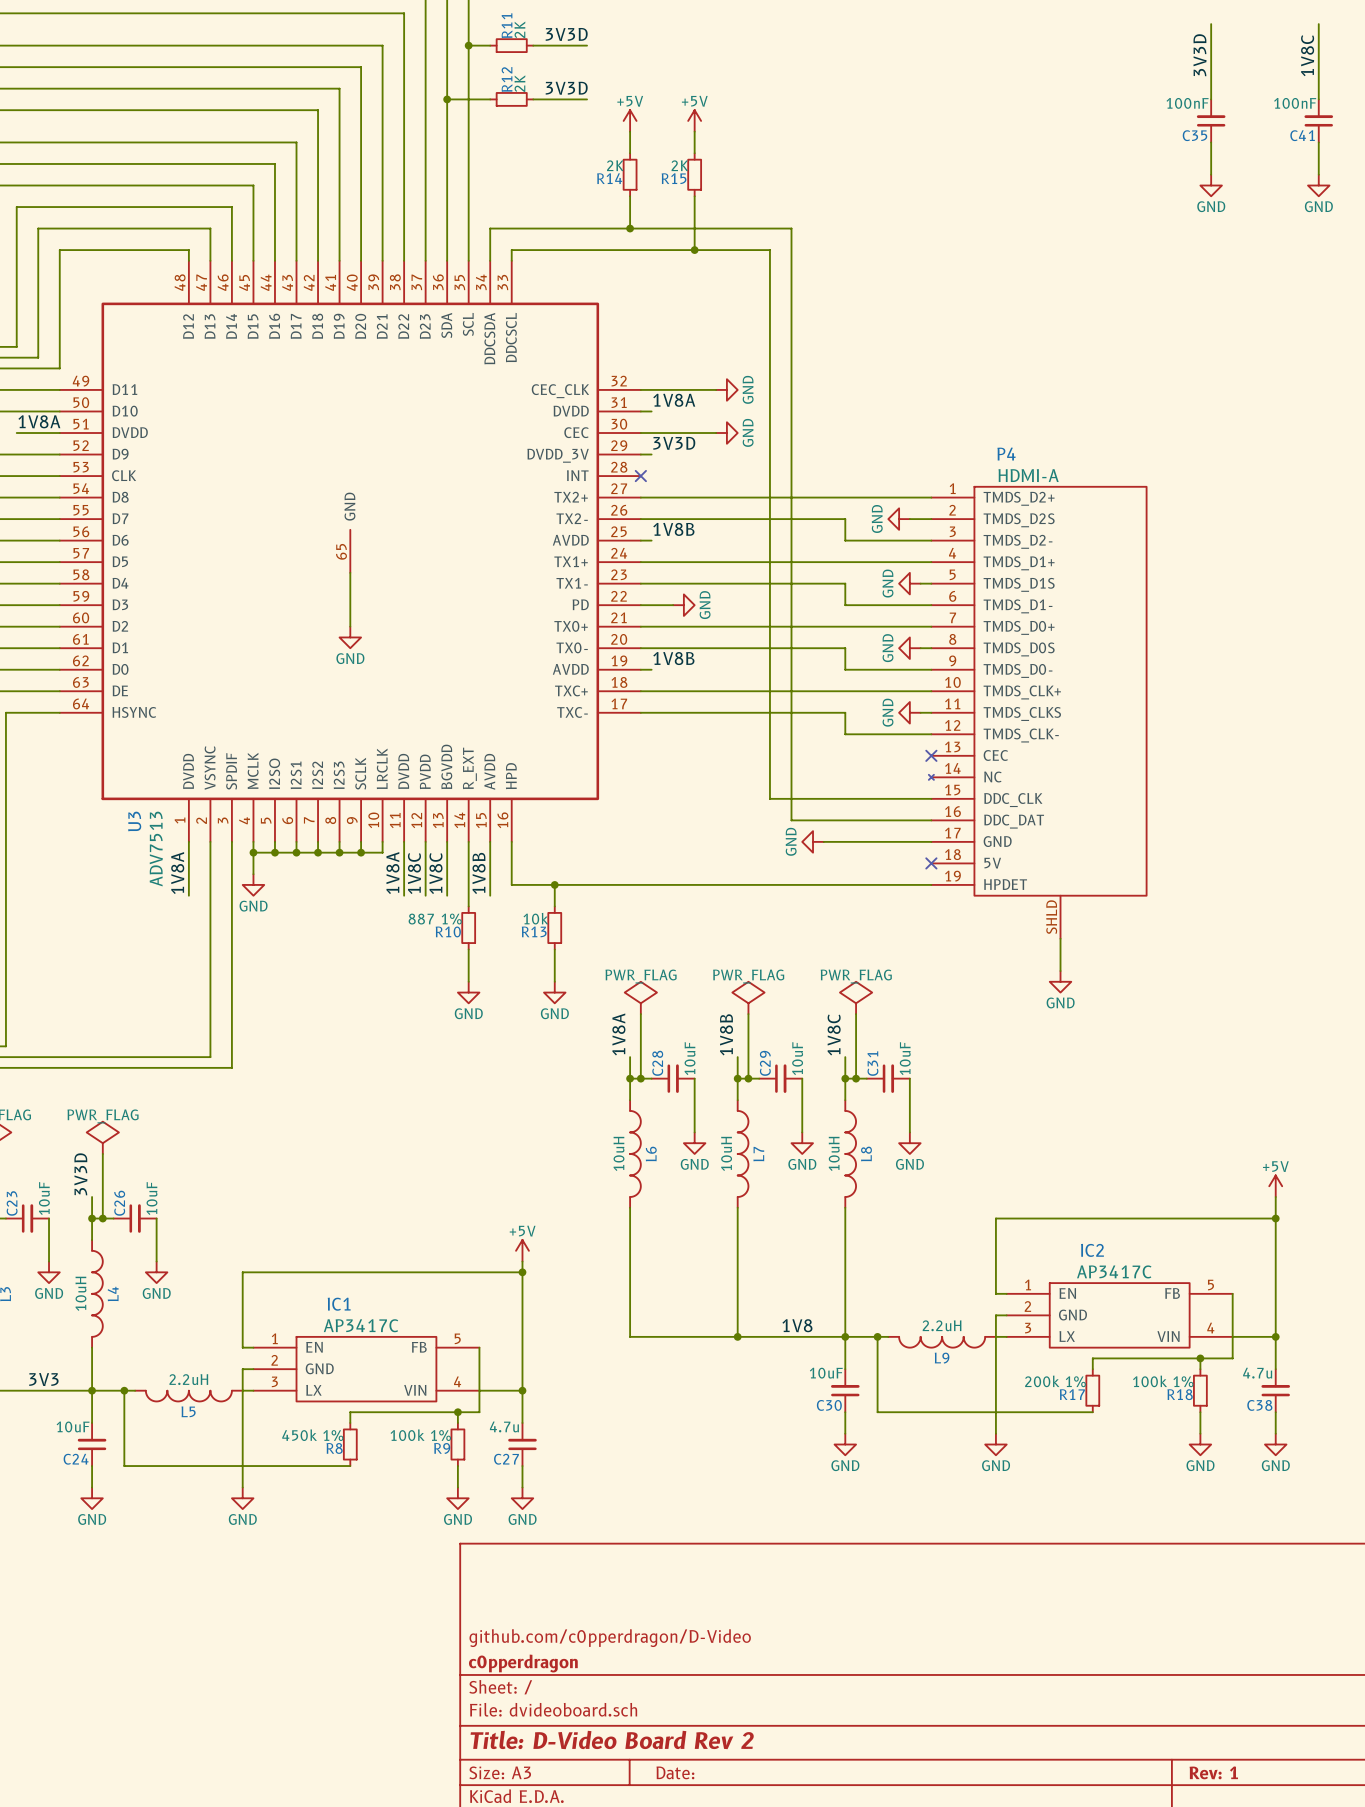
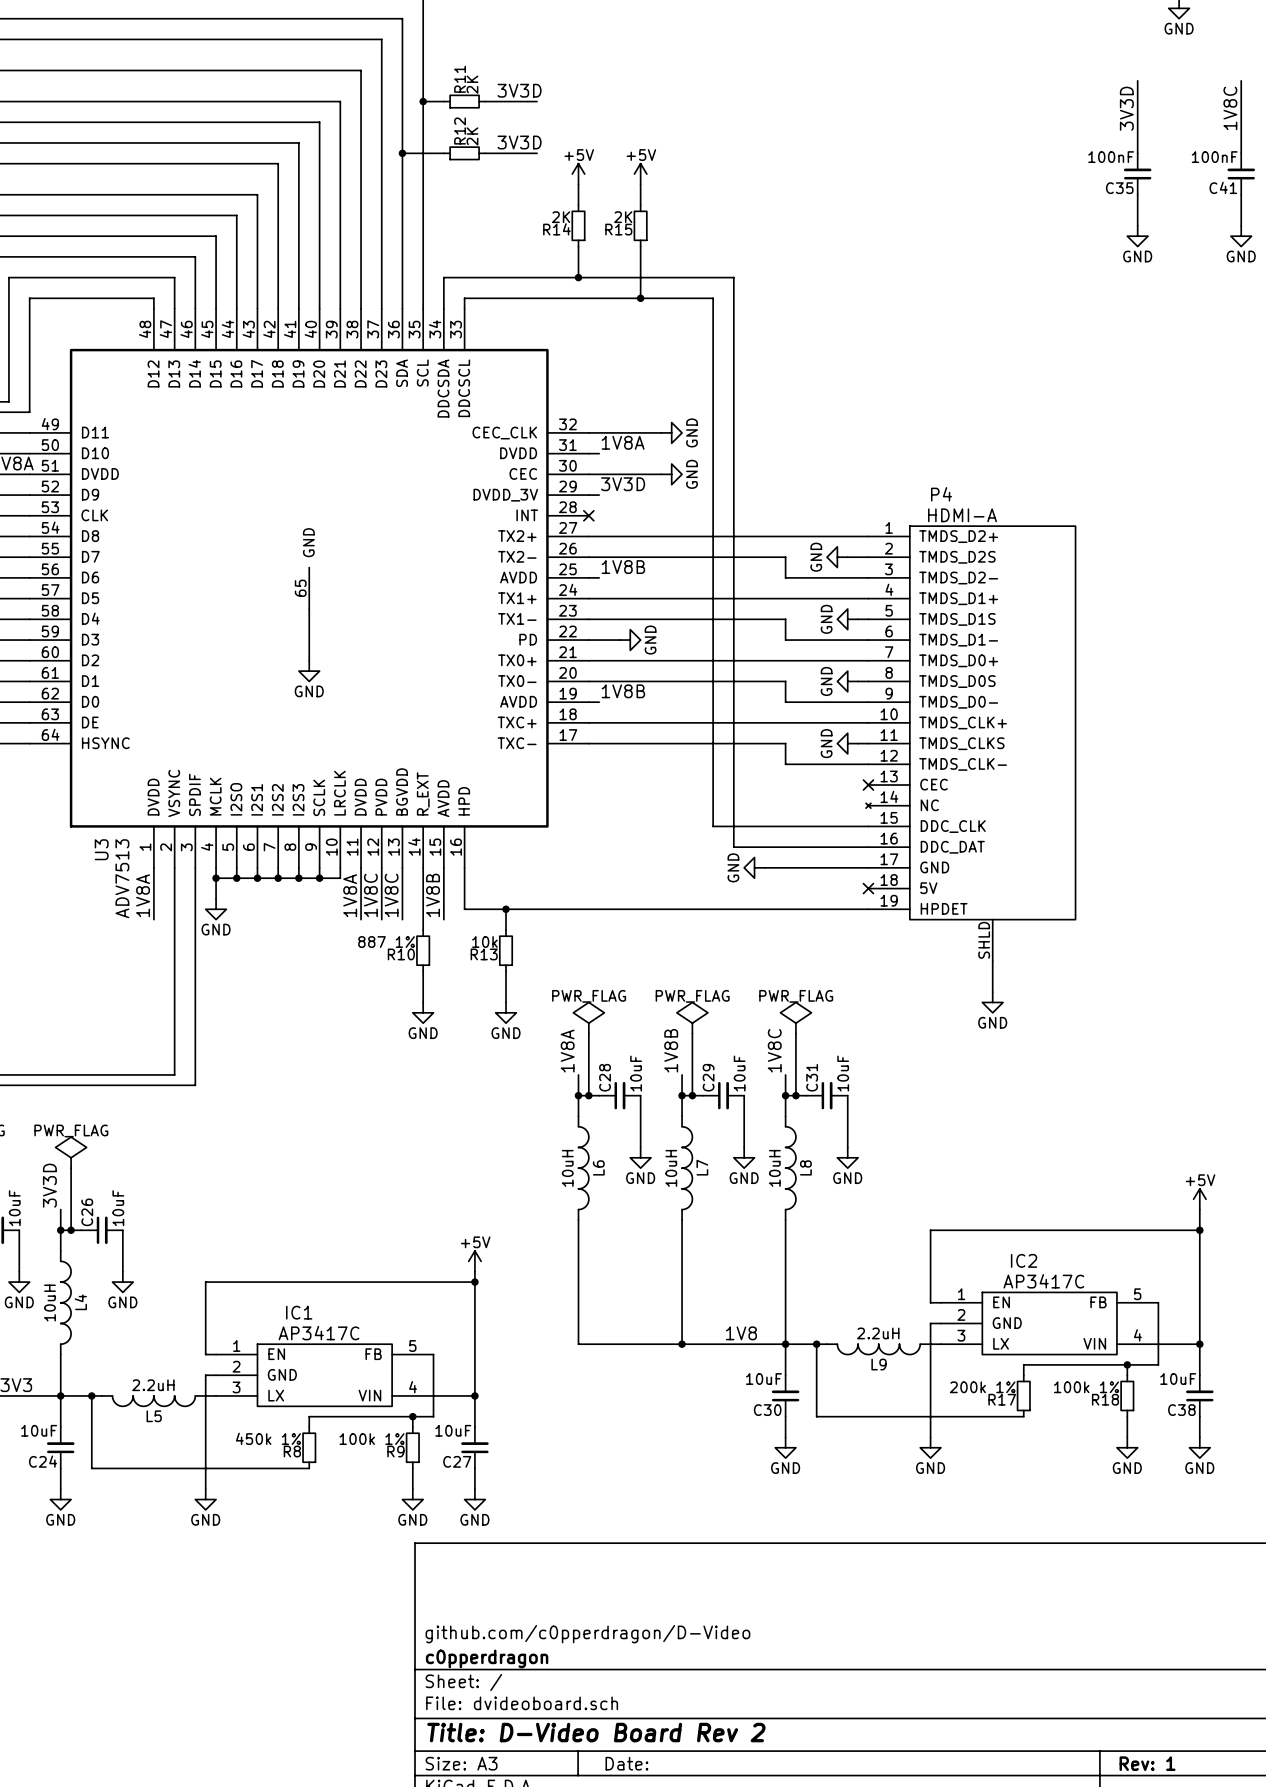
C38 value: 4.7u (1257, 1373) -> 10uF (1178, 1379)
C27 value: 4.7u (504, 1426) -> 10uF (453, 1430)

